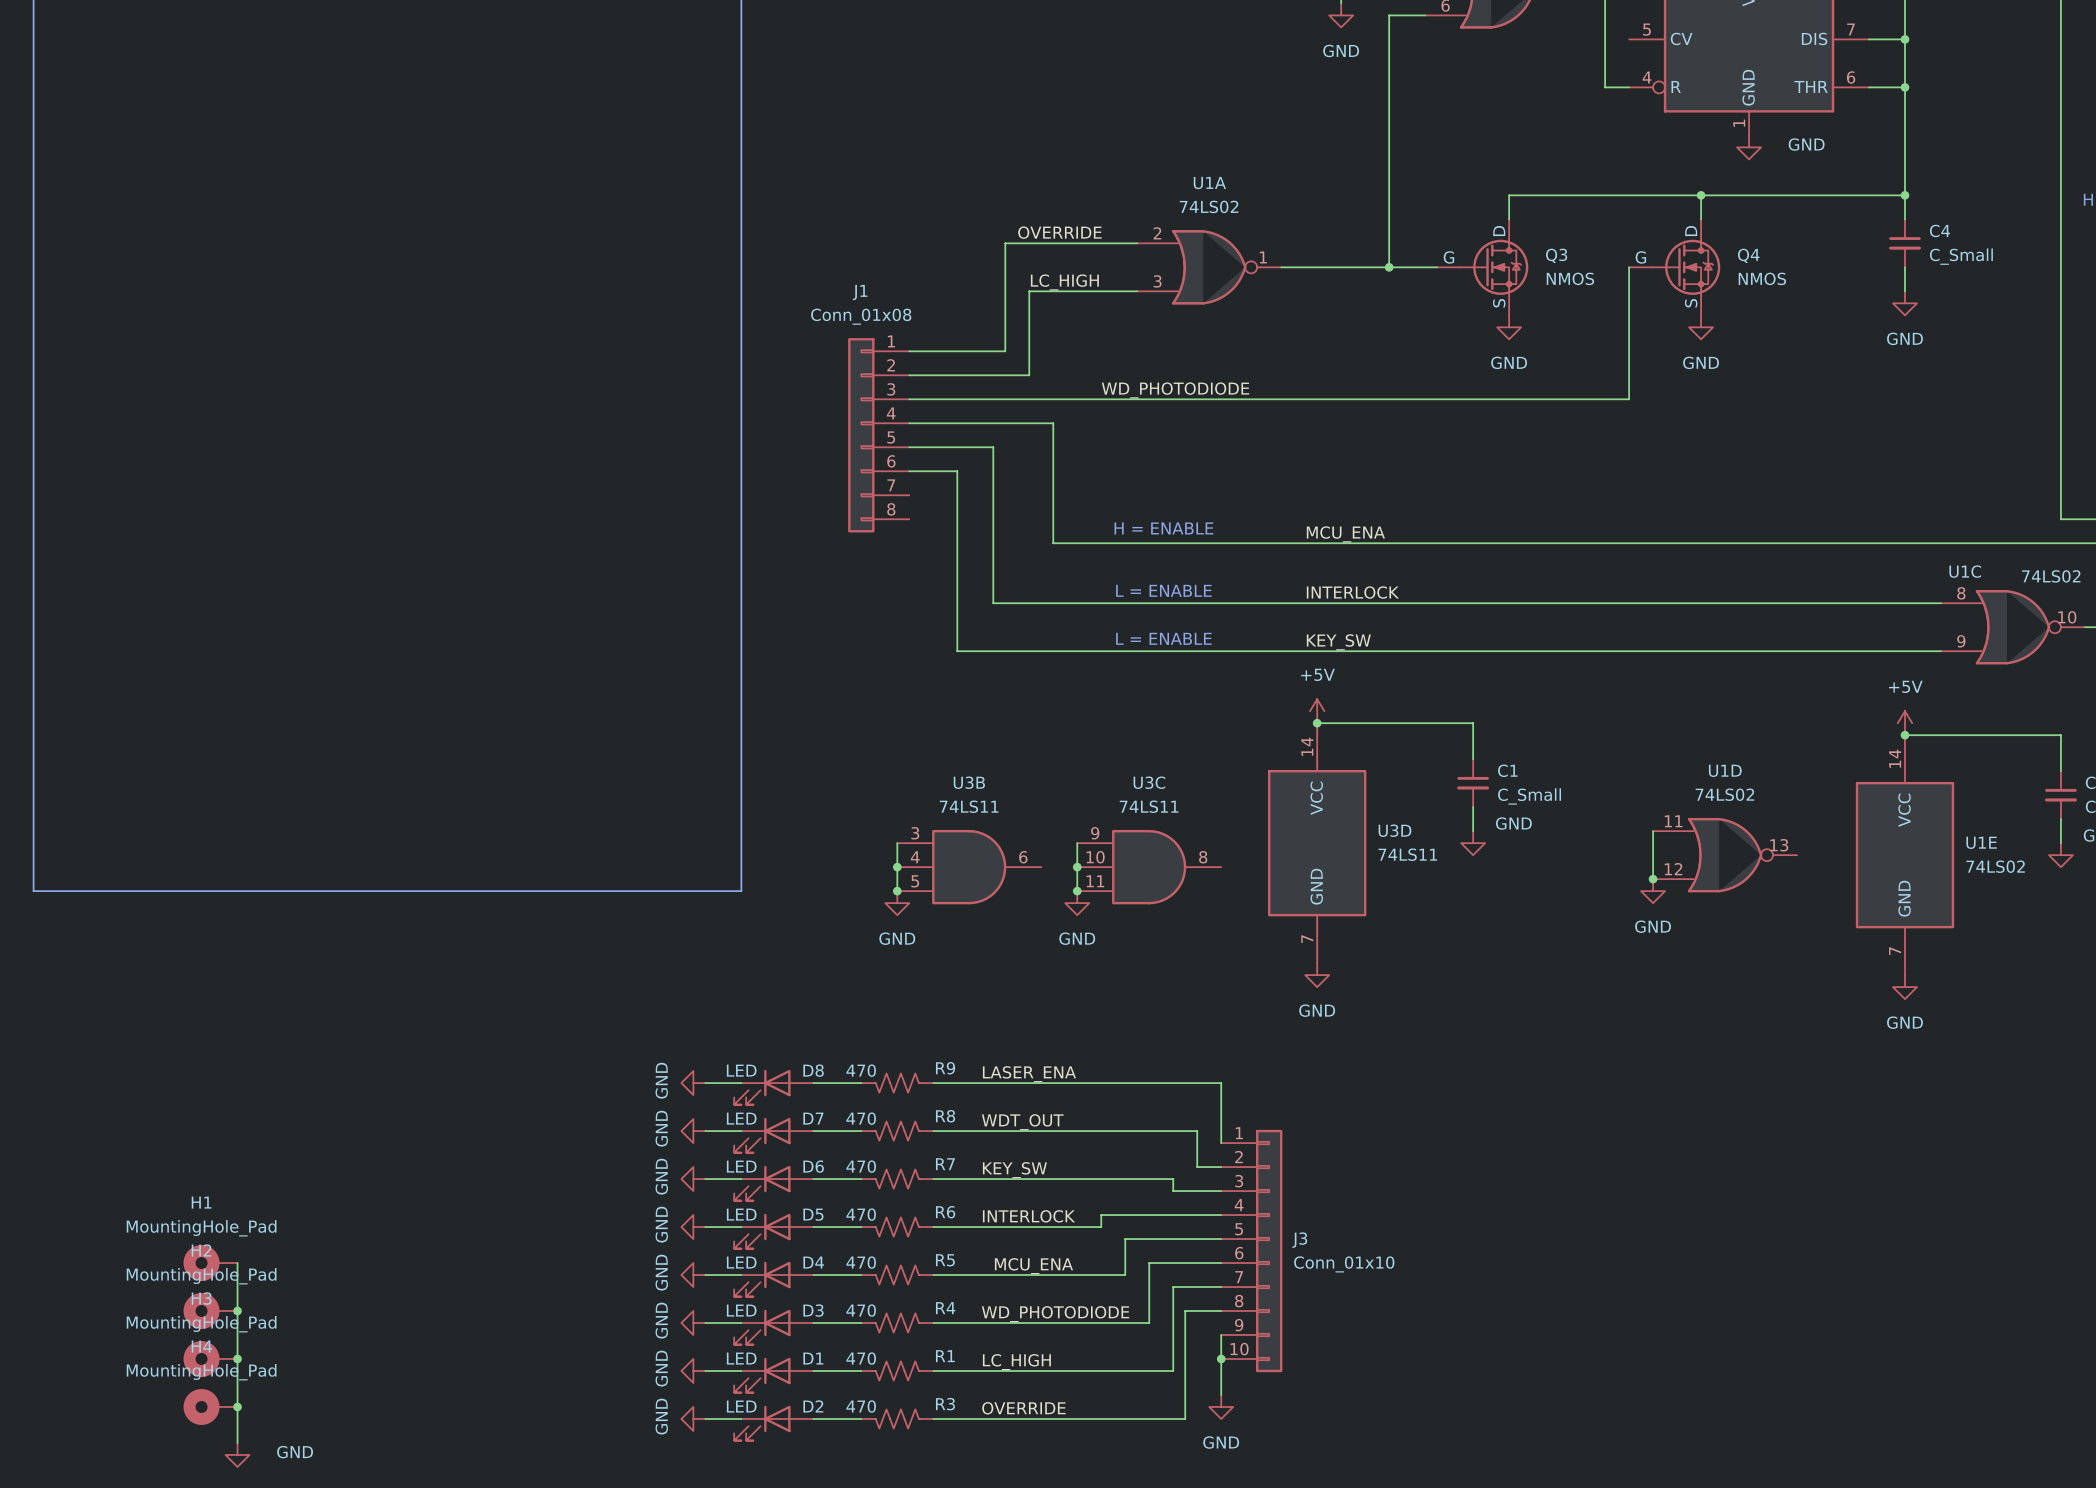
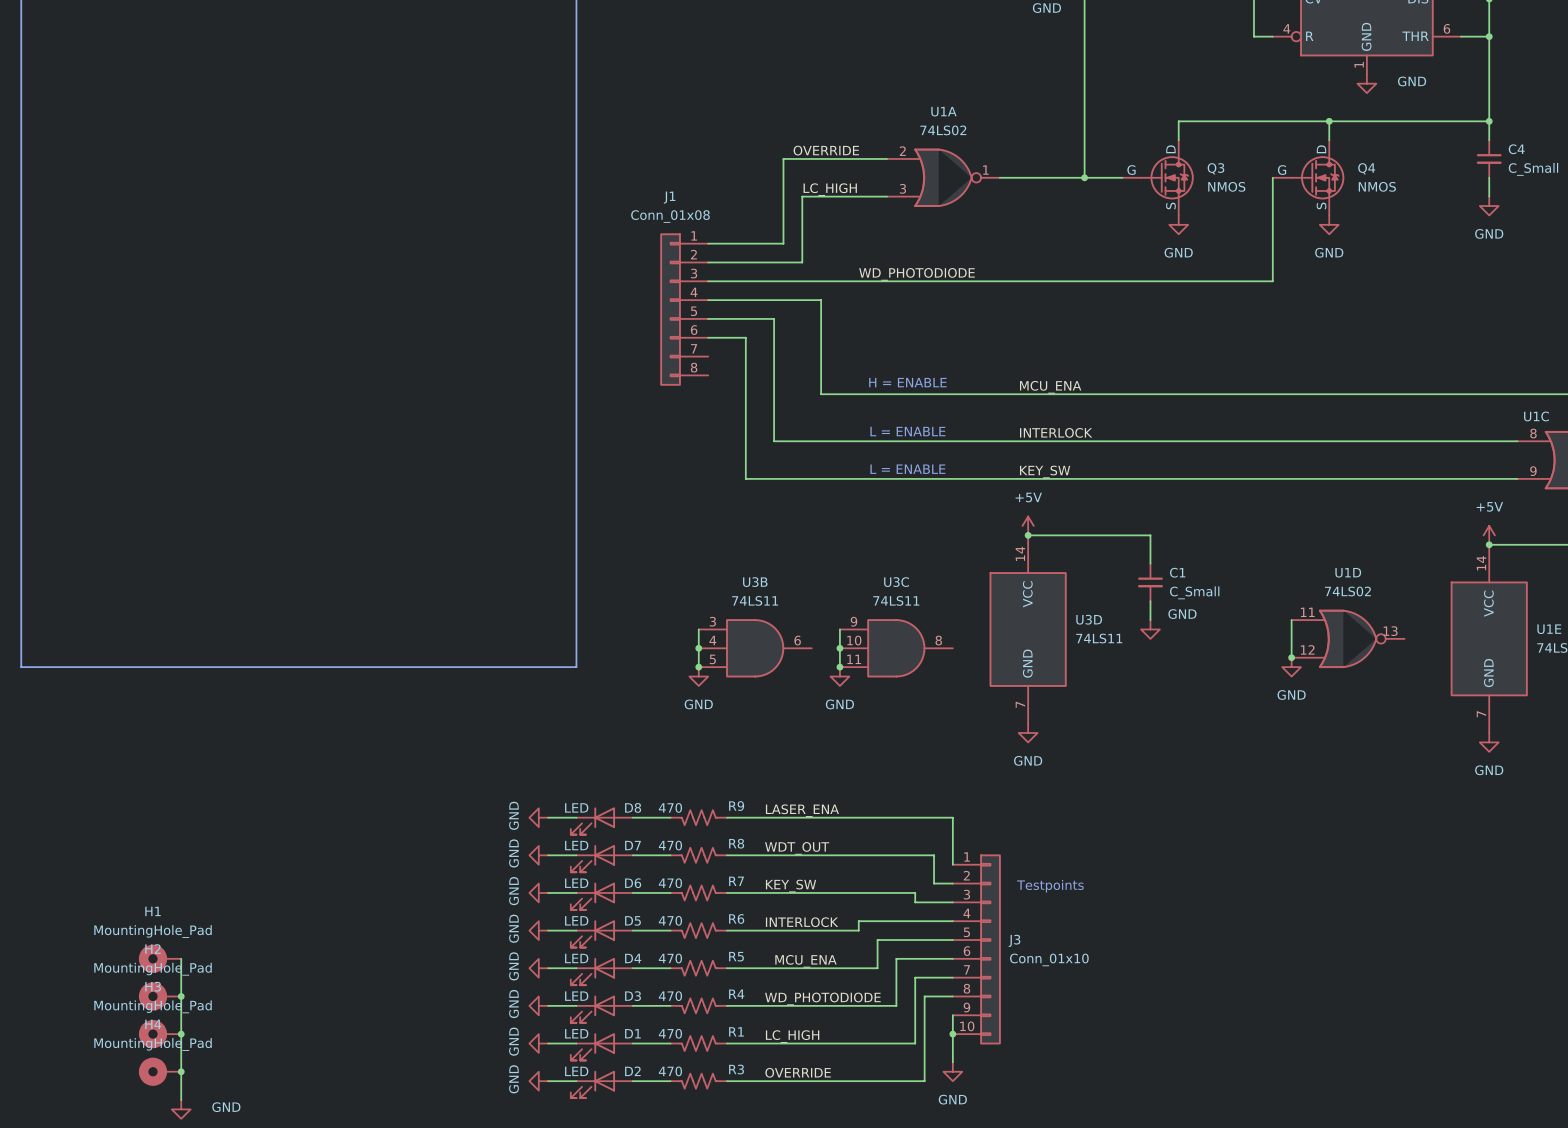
text: none -> Testpoints (1050, 886)

